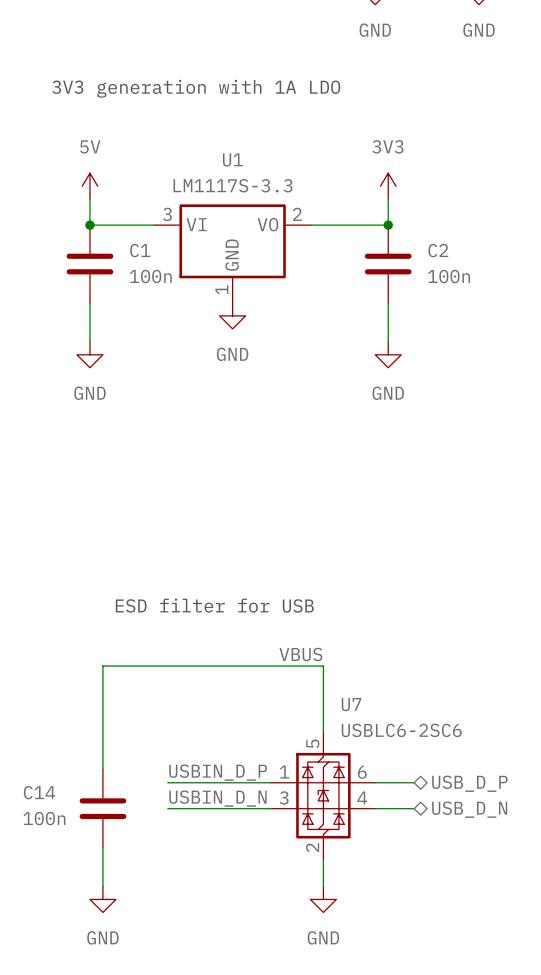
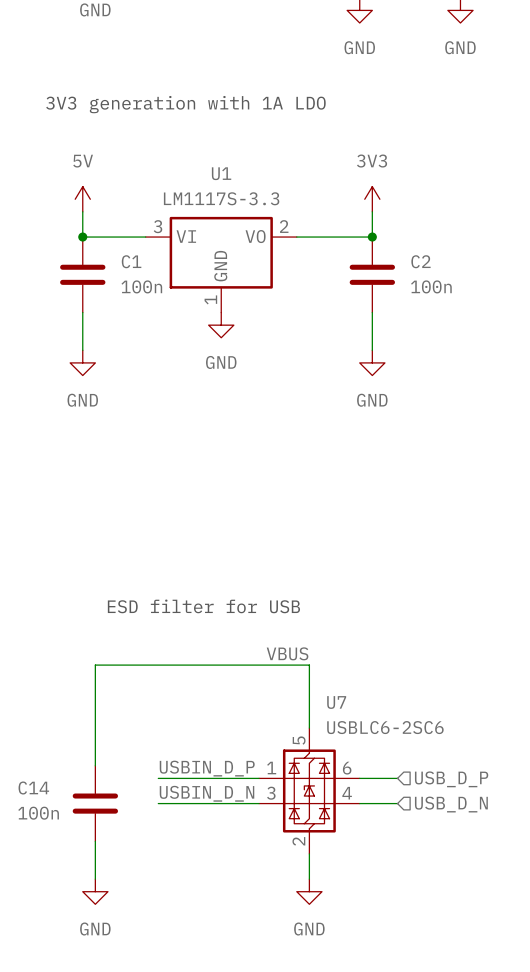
hierarchical label shape: bidirectional (469, 783) -> input (451, 779)
hierarchical label shape: bidirectional (469, 809) -> input (451, 804)

